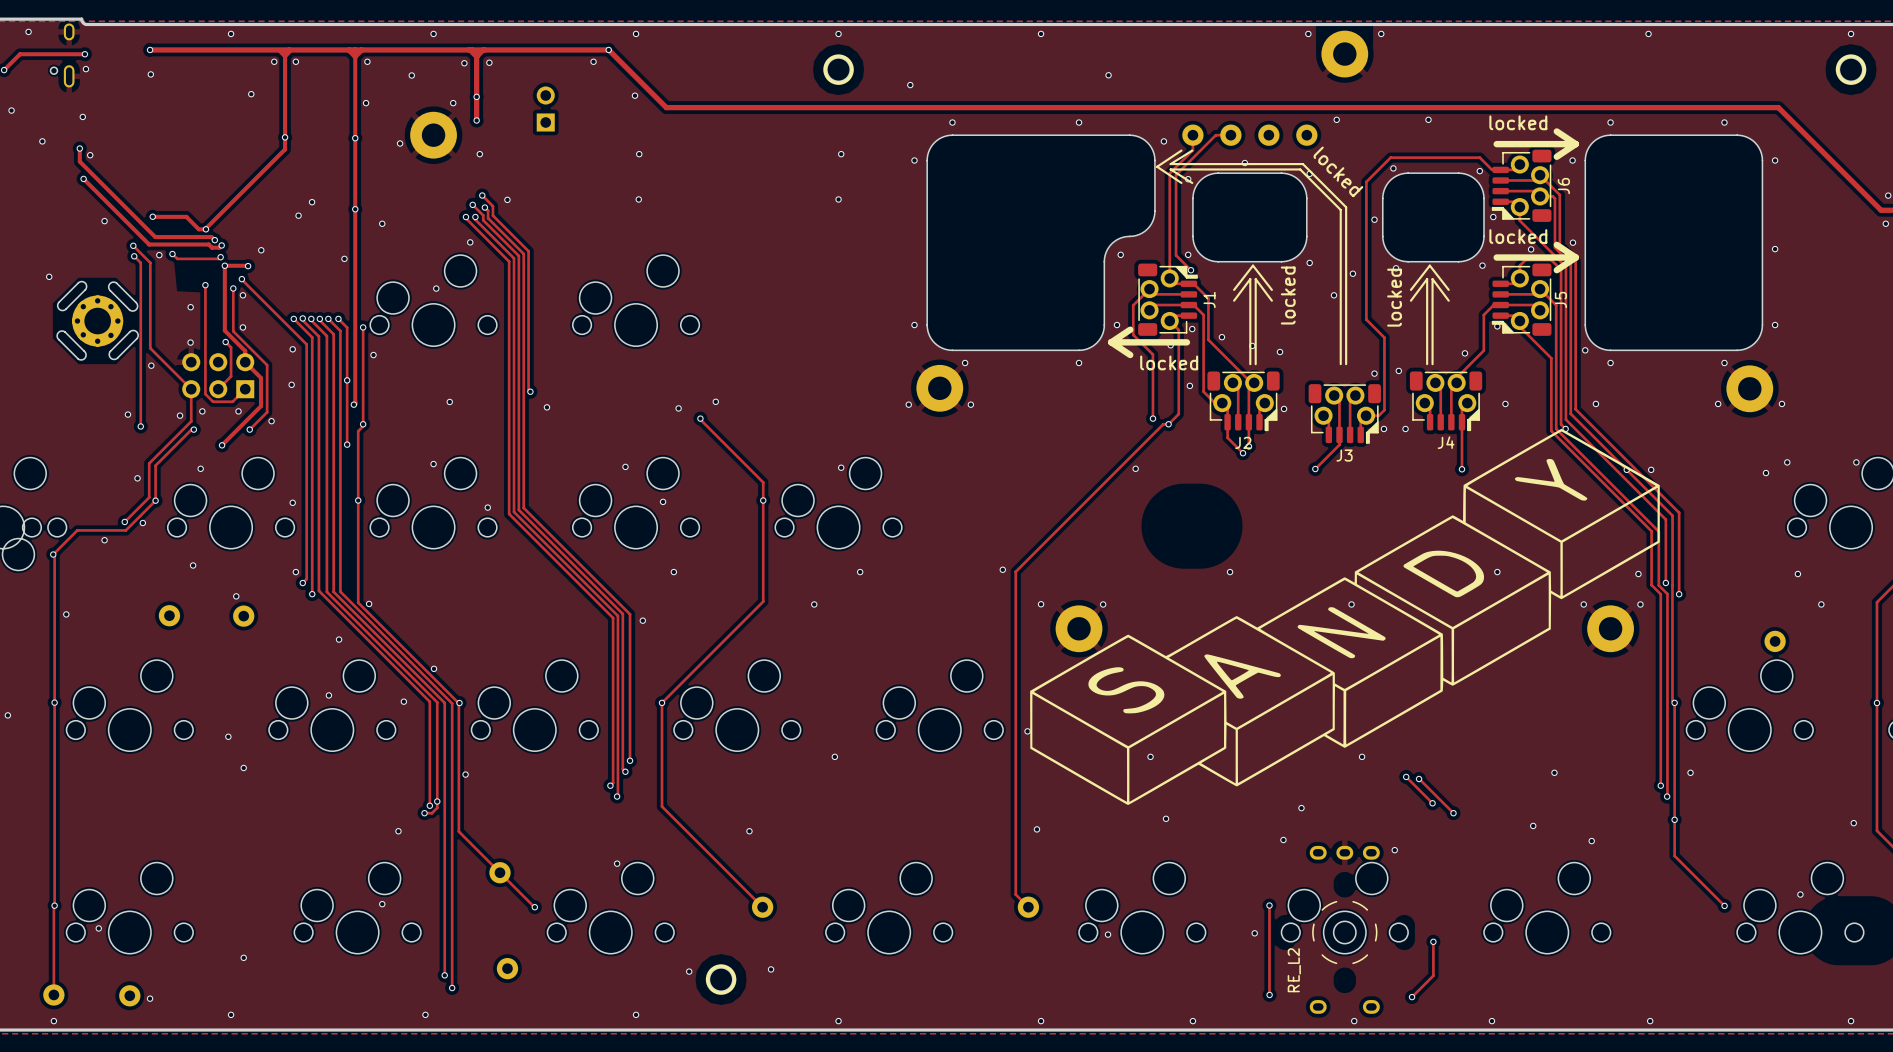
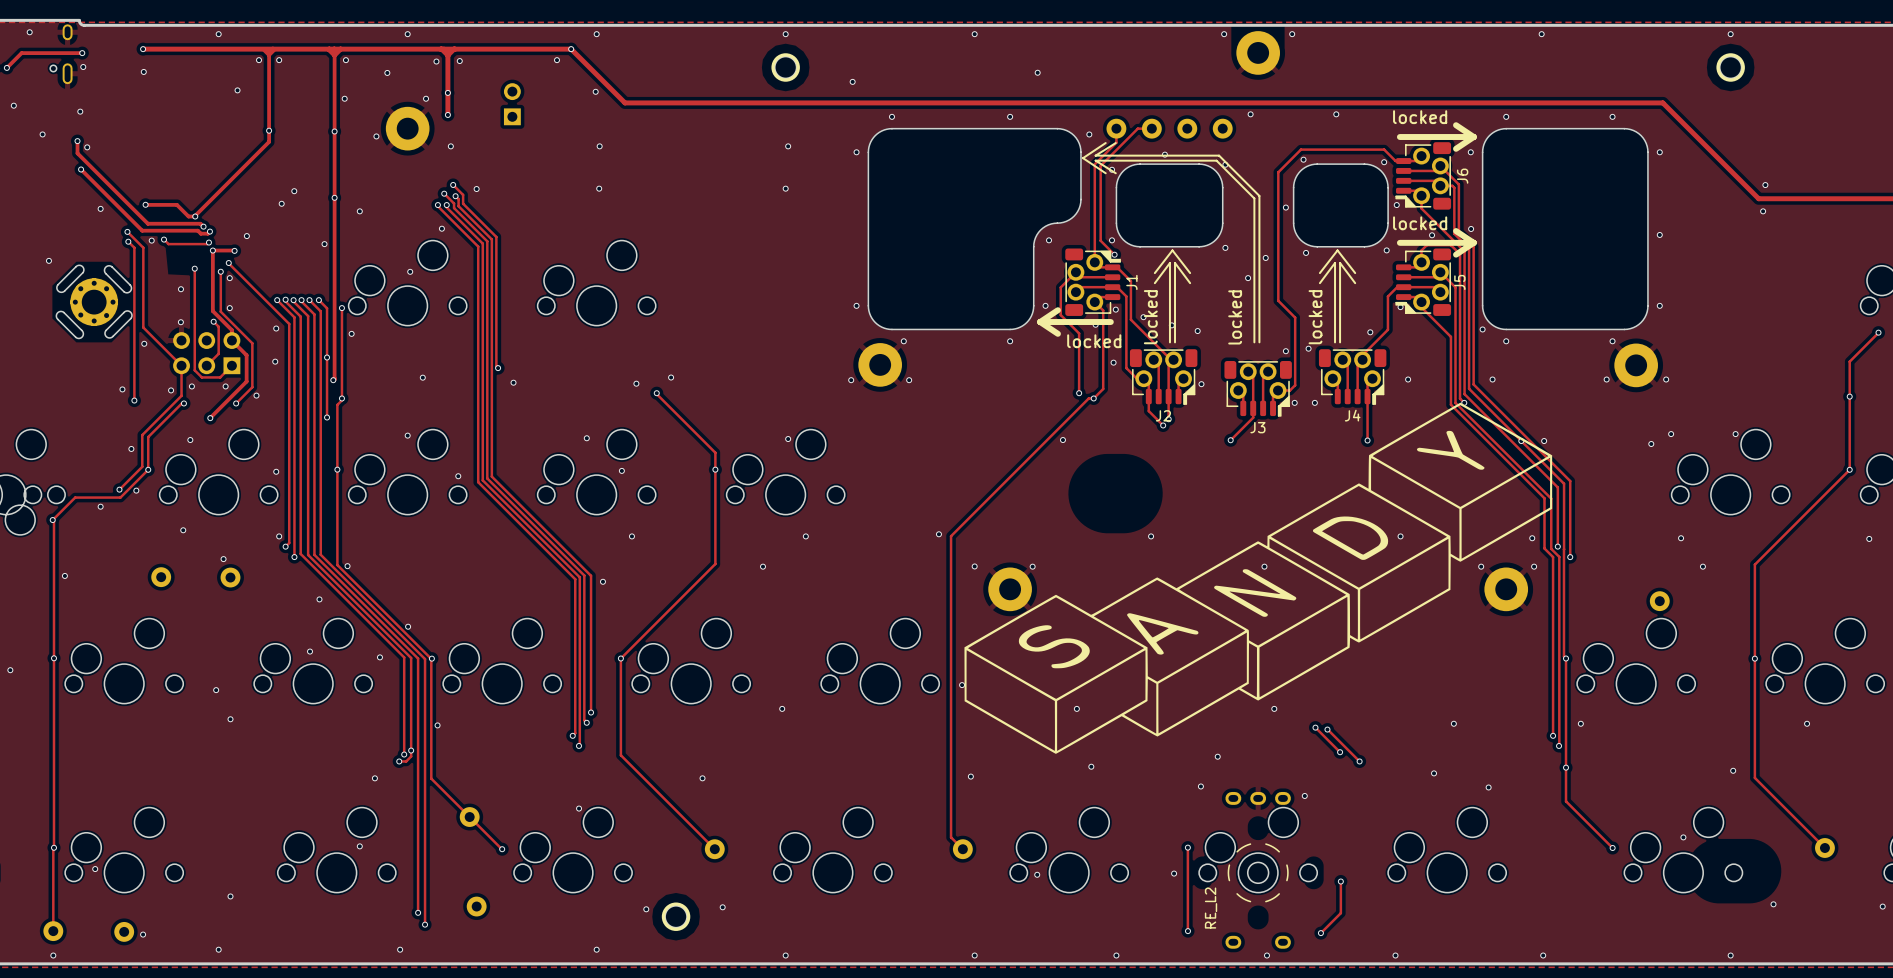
text: locked (1338, 171) -> none
text: locked (1288, 295) -> none
text position: locked (1394, 297) -> locked (1315, 317)
text: none -> locked (1150, 317)
text: none -> locked (1235, 317)

